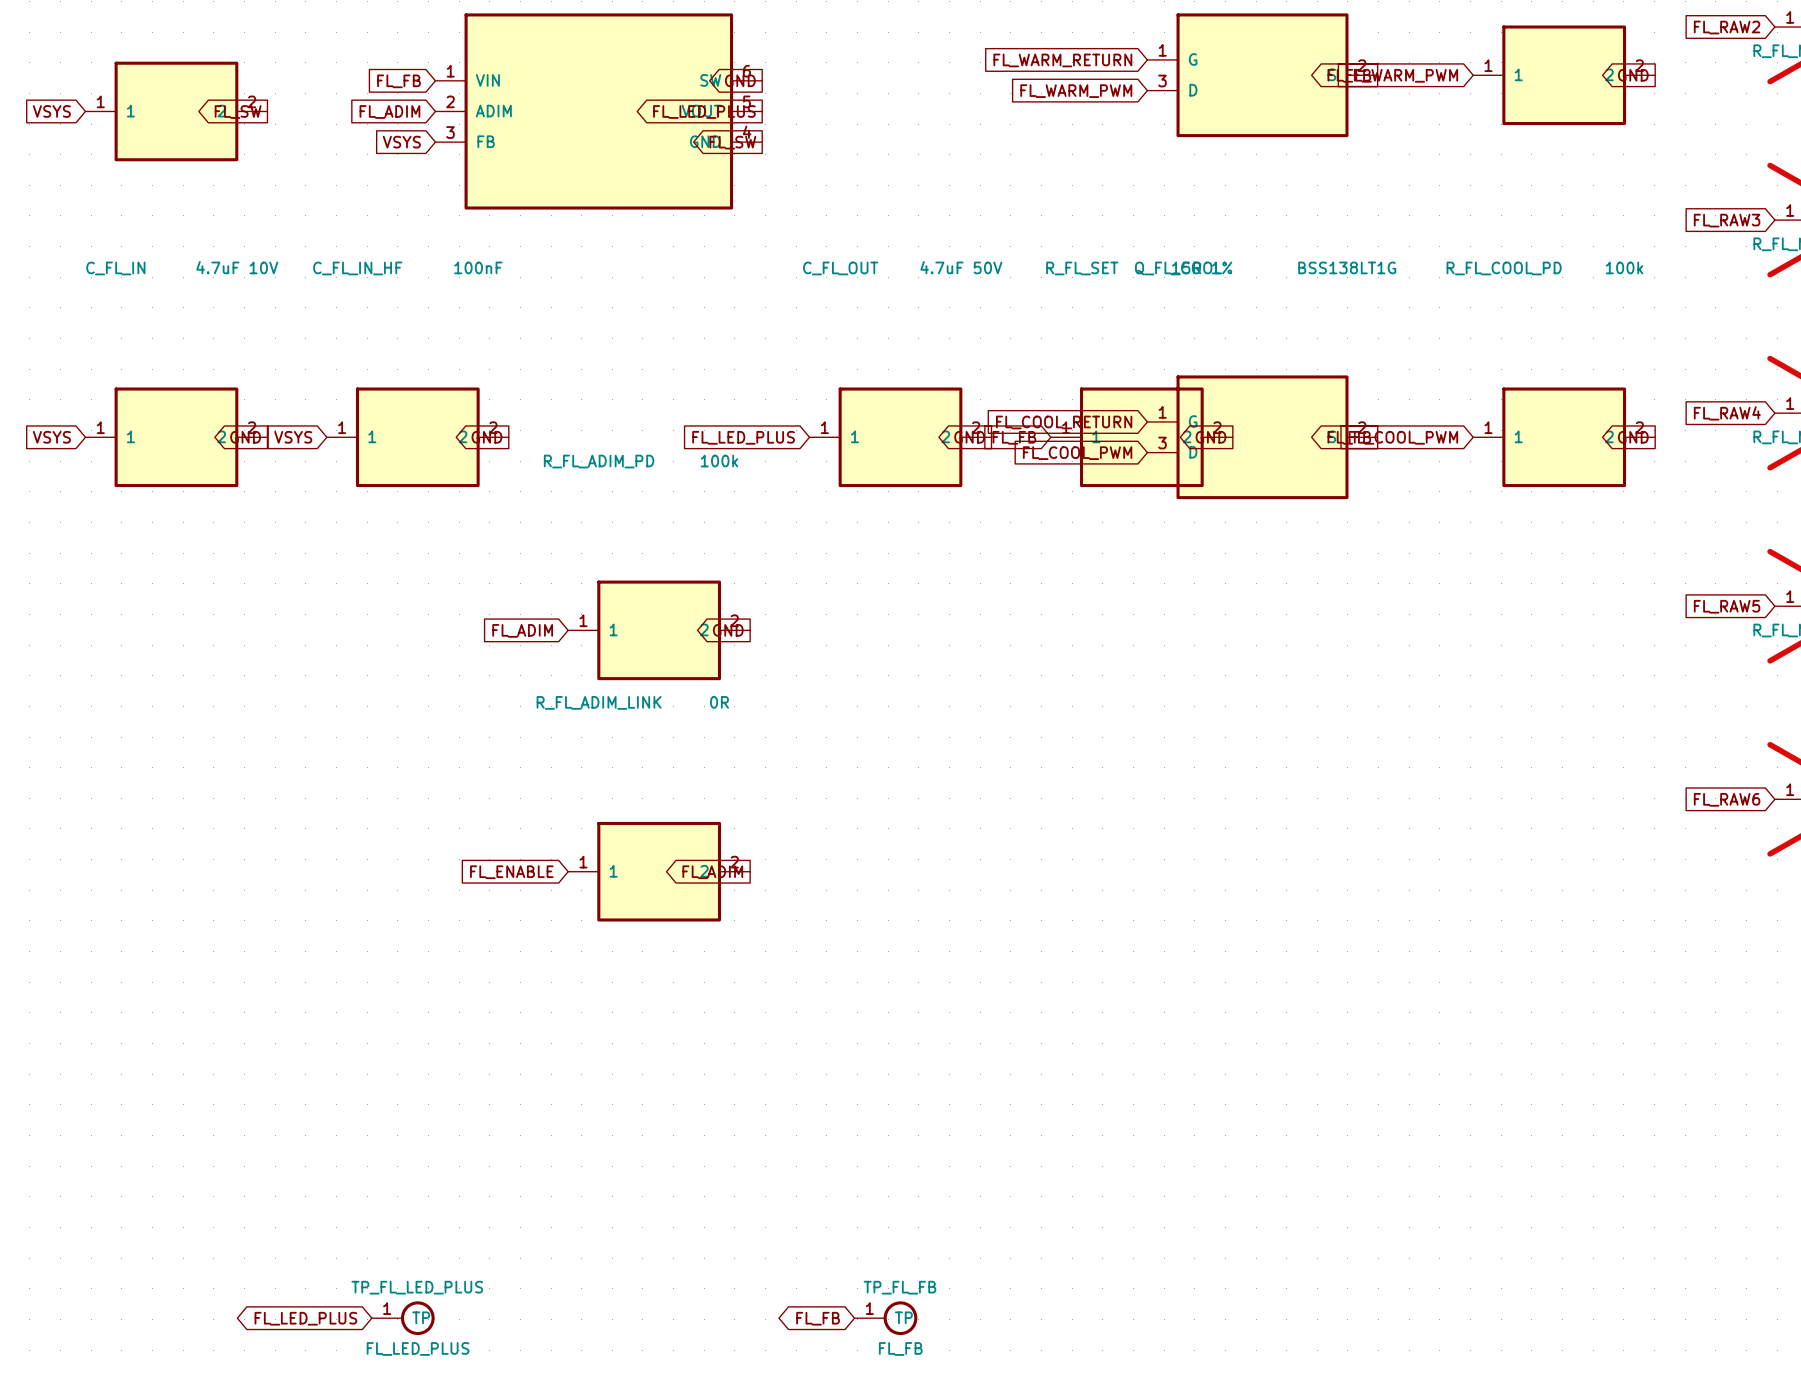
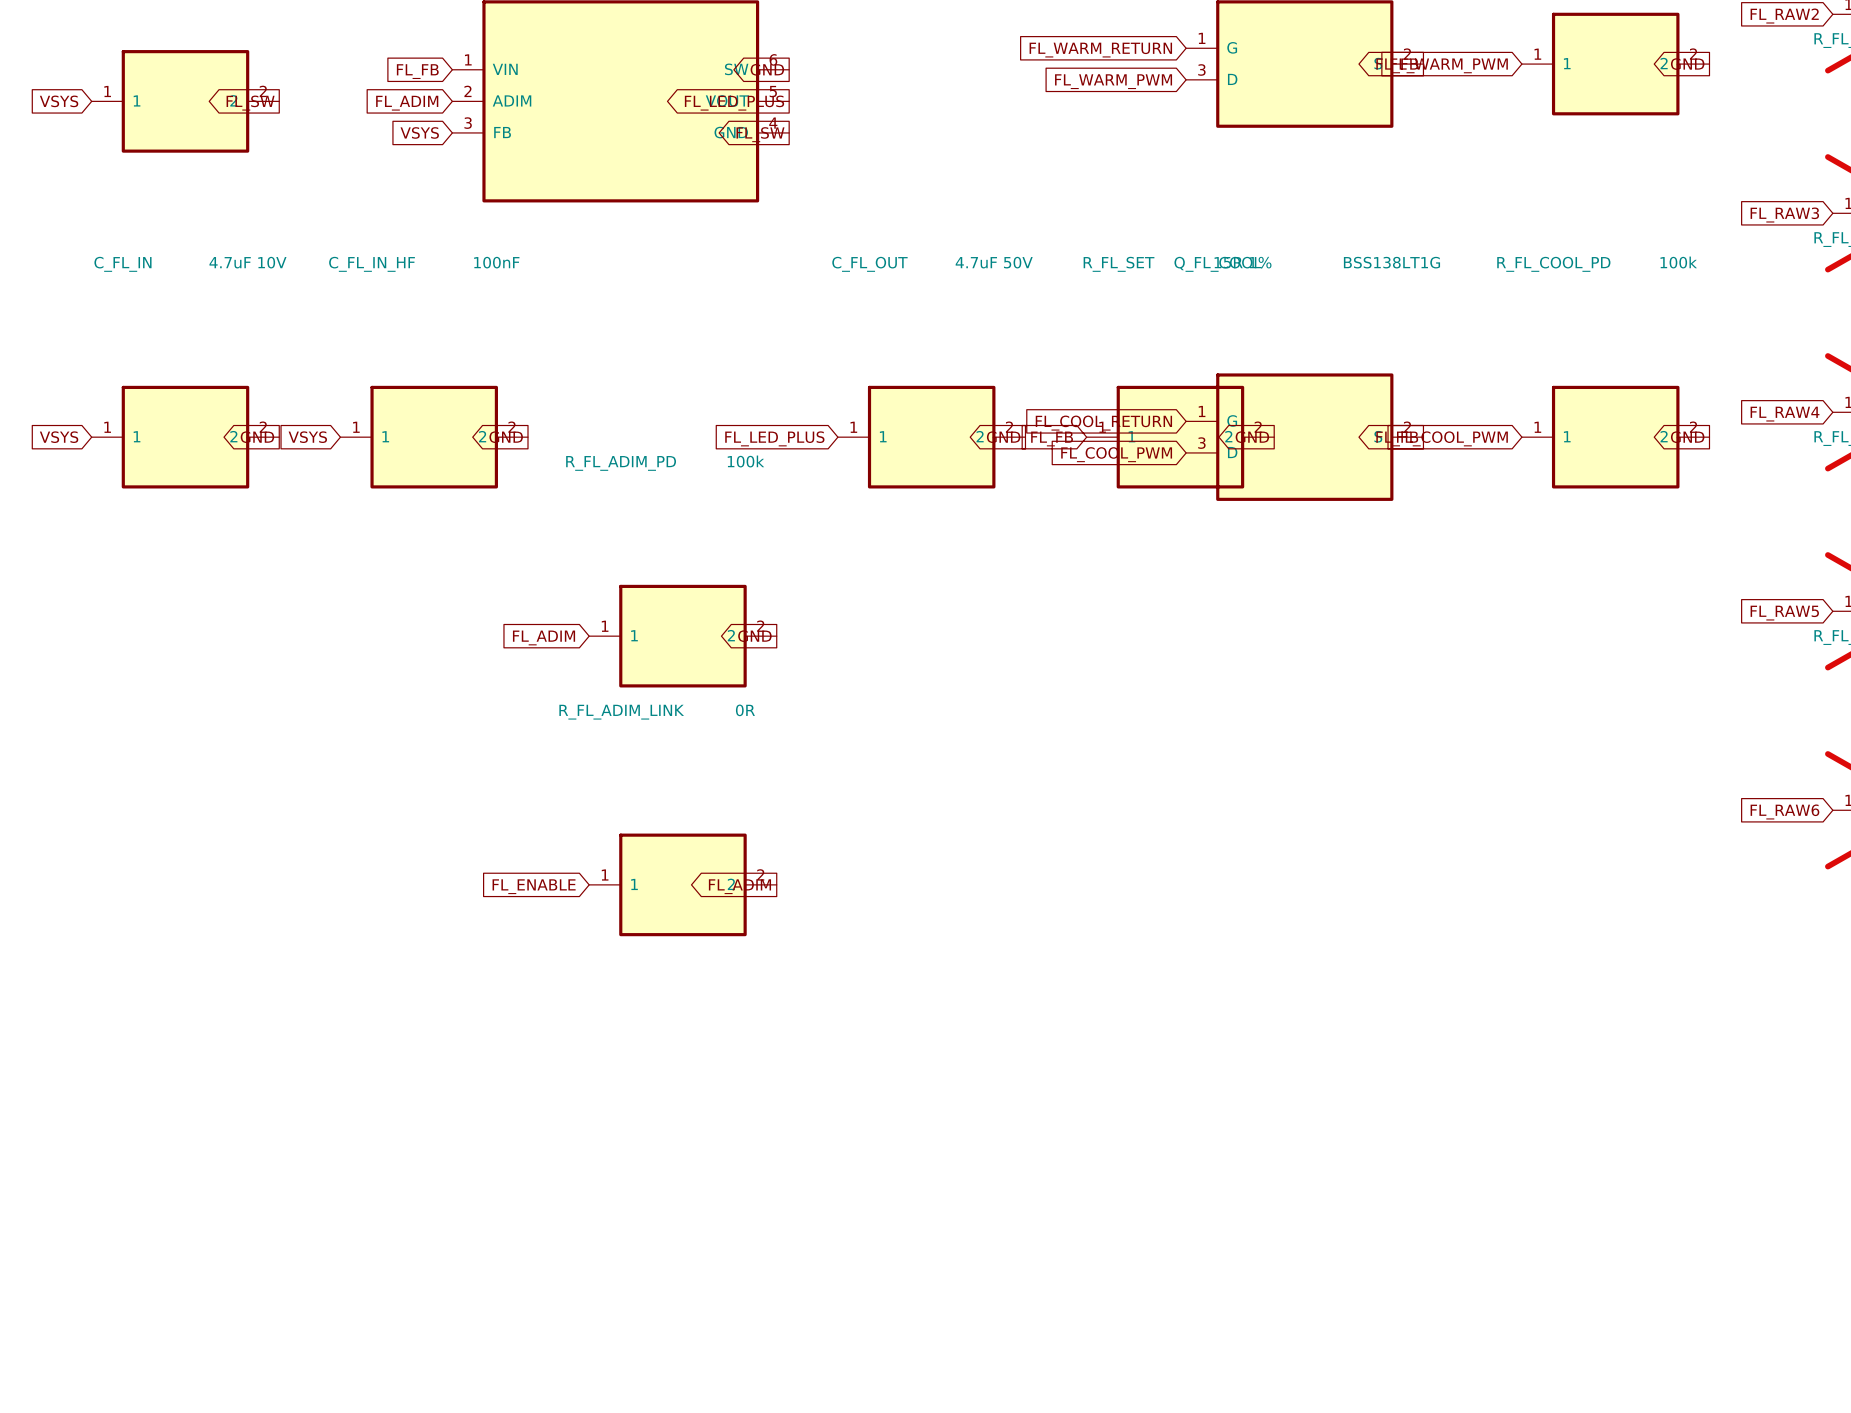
global label: FL_LED_PLUS (305, 1318) -> none
TP_FL_LED_PLUS: FL_LED_PLUS (403, 1318) -> none
global label: FL_FB (818, 1318) -> none
TP_FL_FB: FL_FB (885, 1318) -> none

